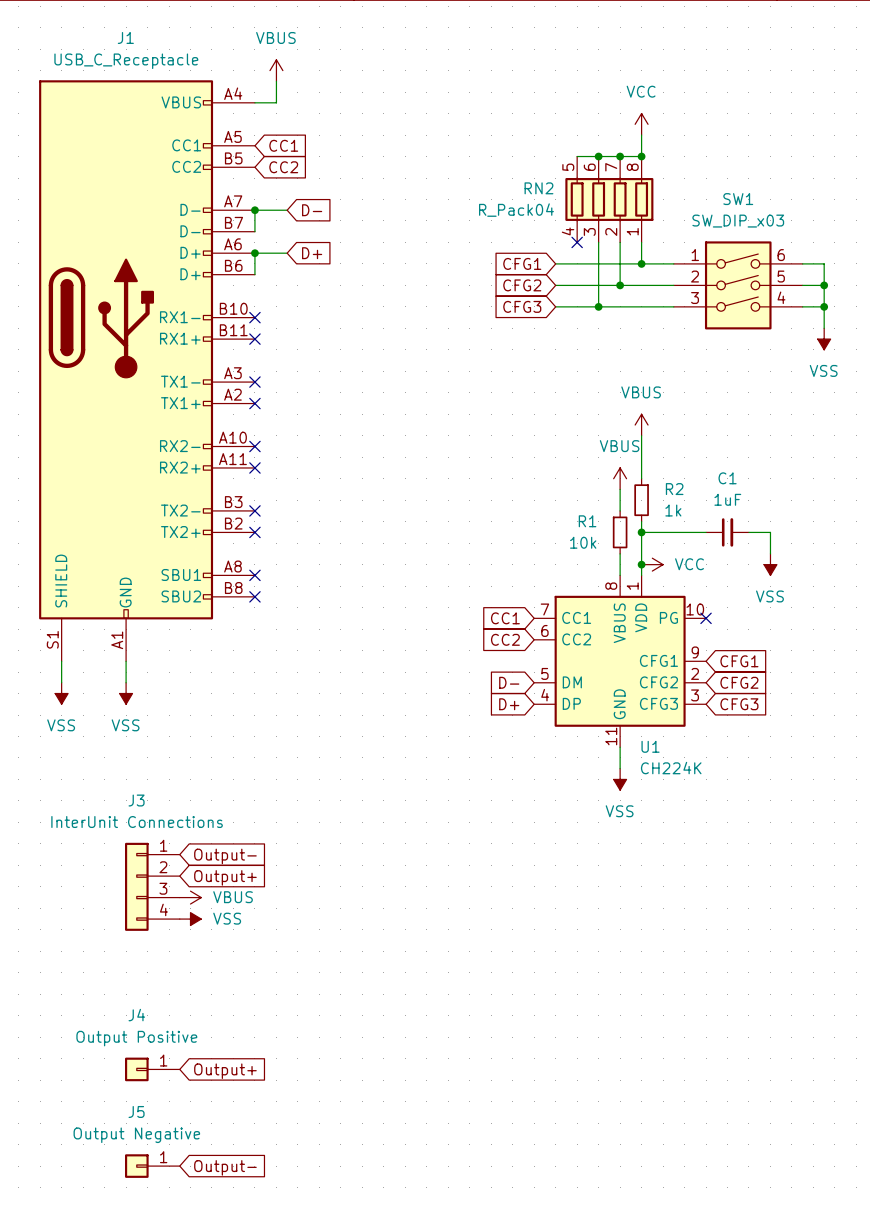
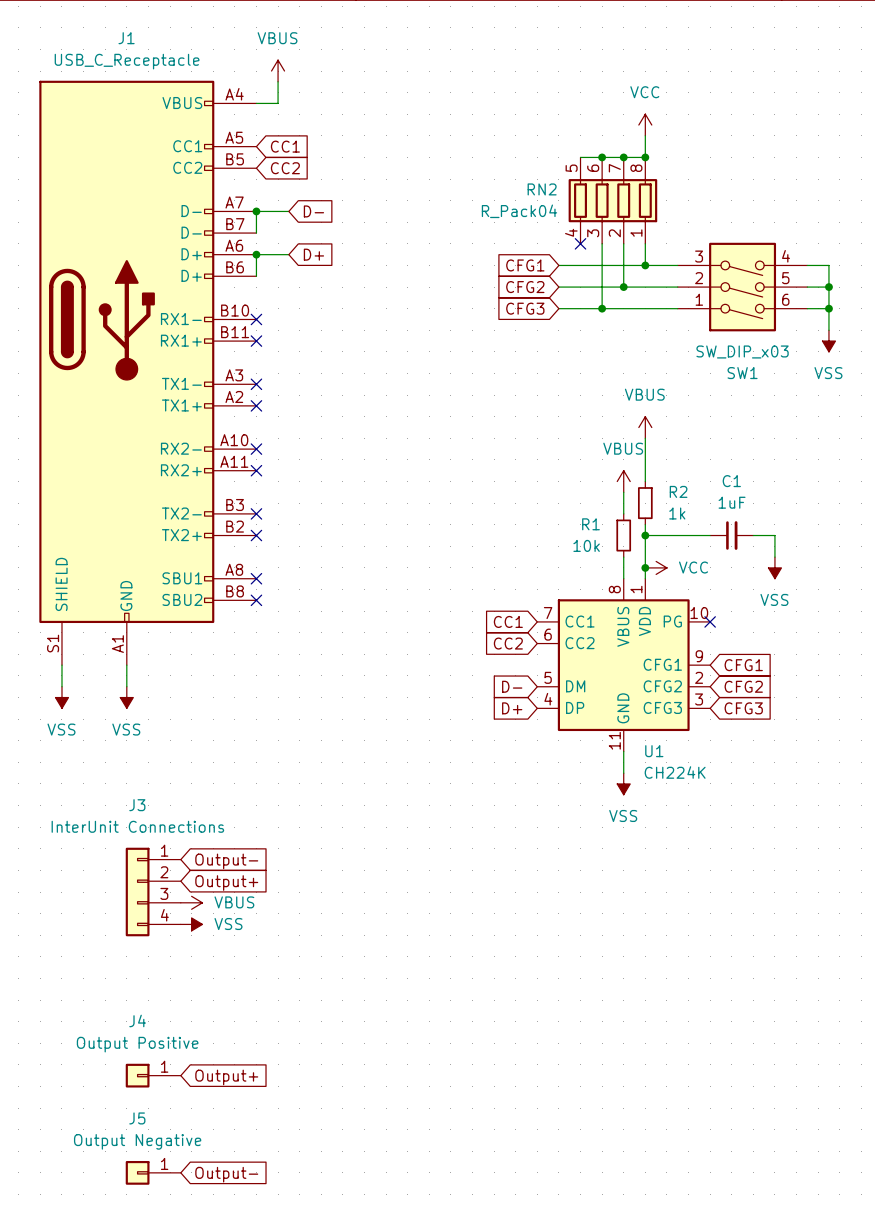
SW1 flip: as is (738, 285) -> up-down (742, 287)

